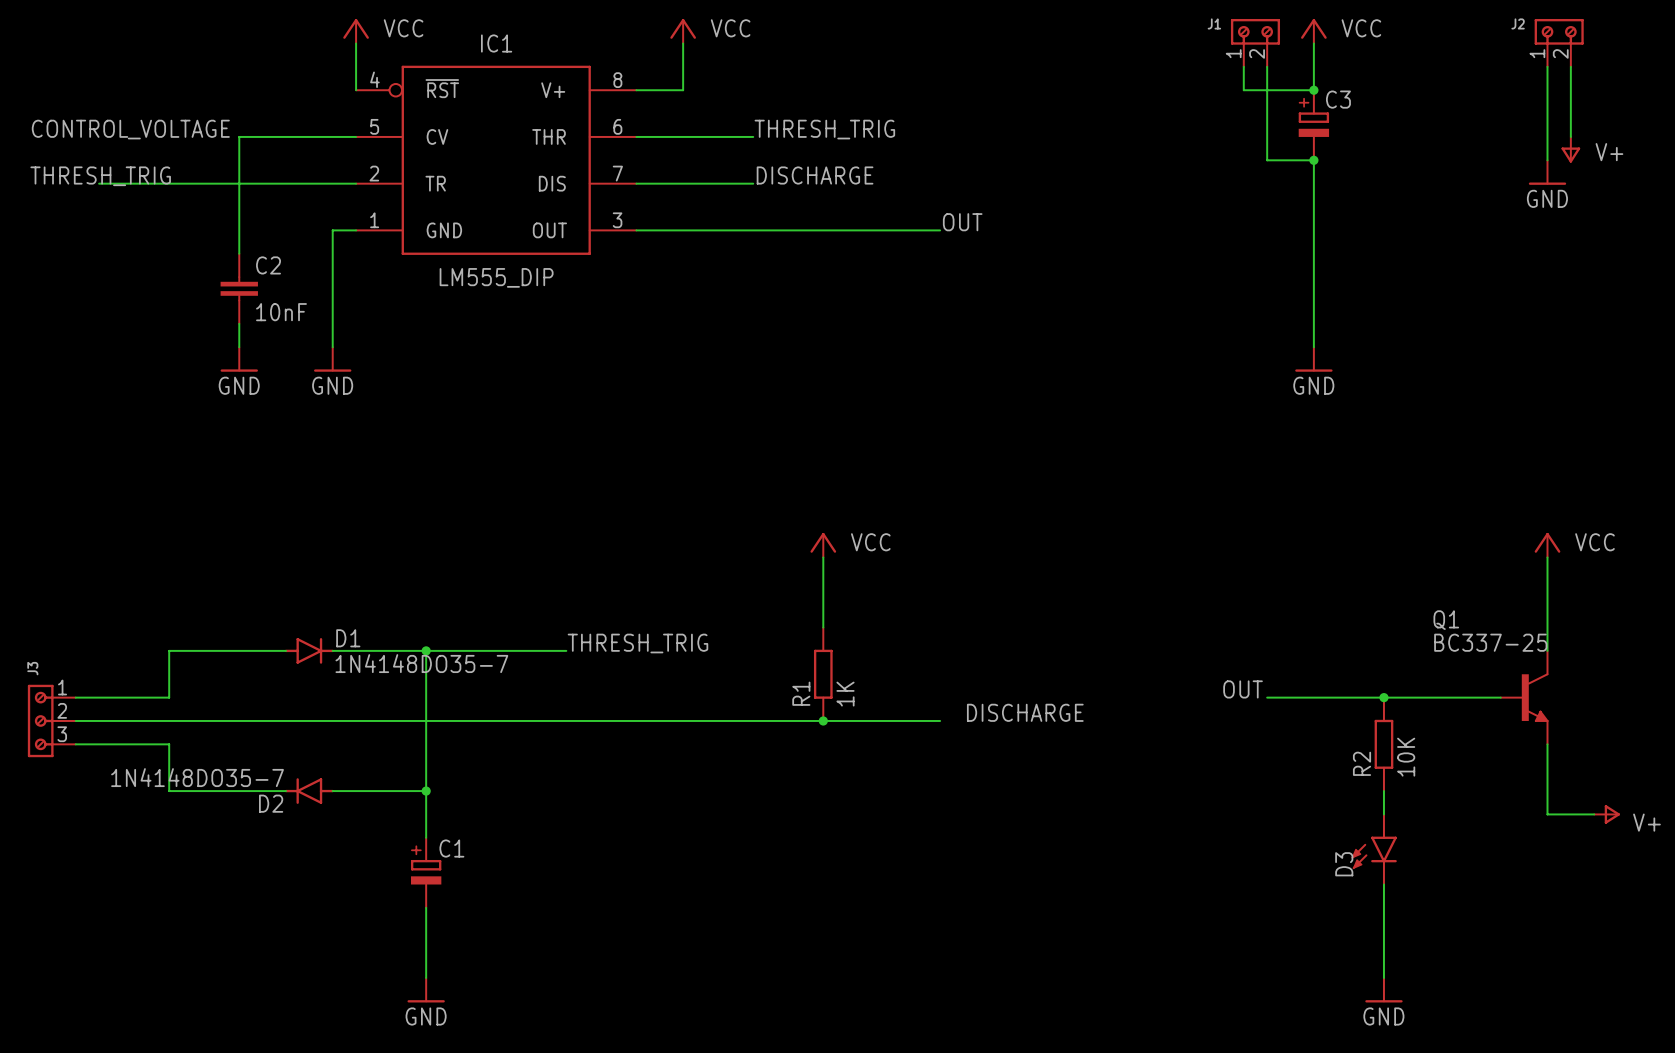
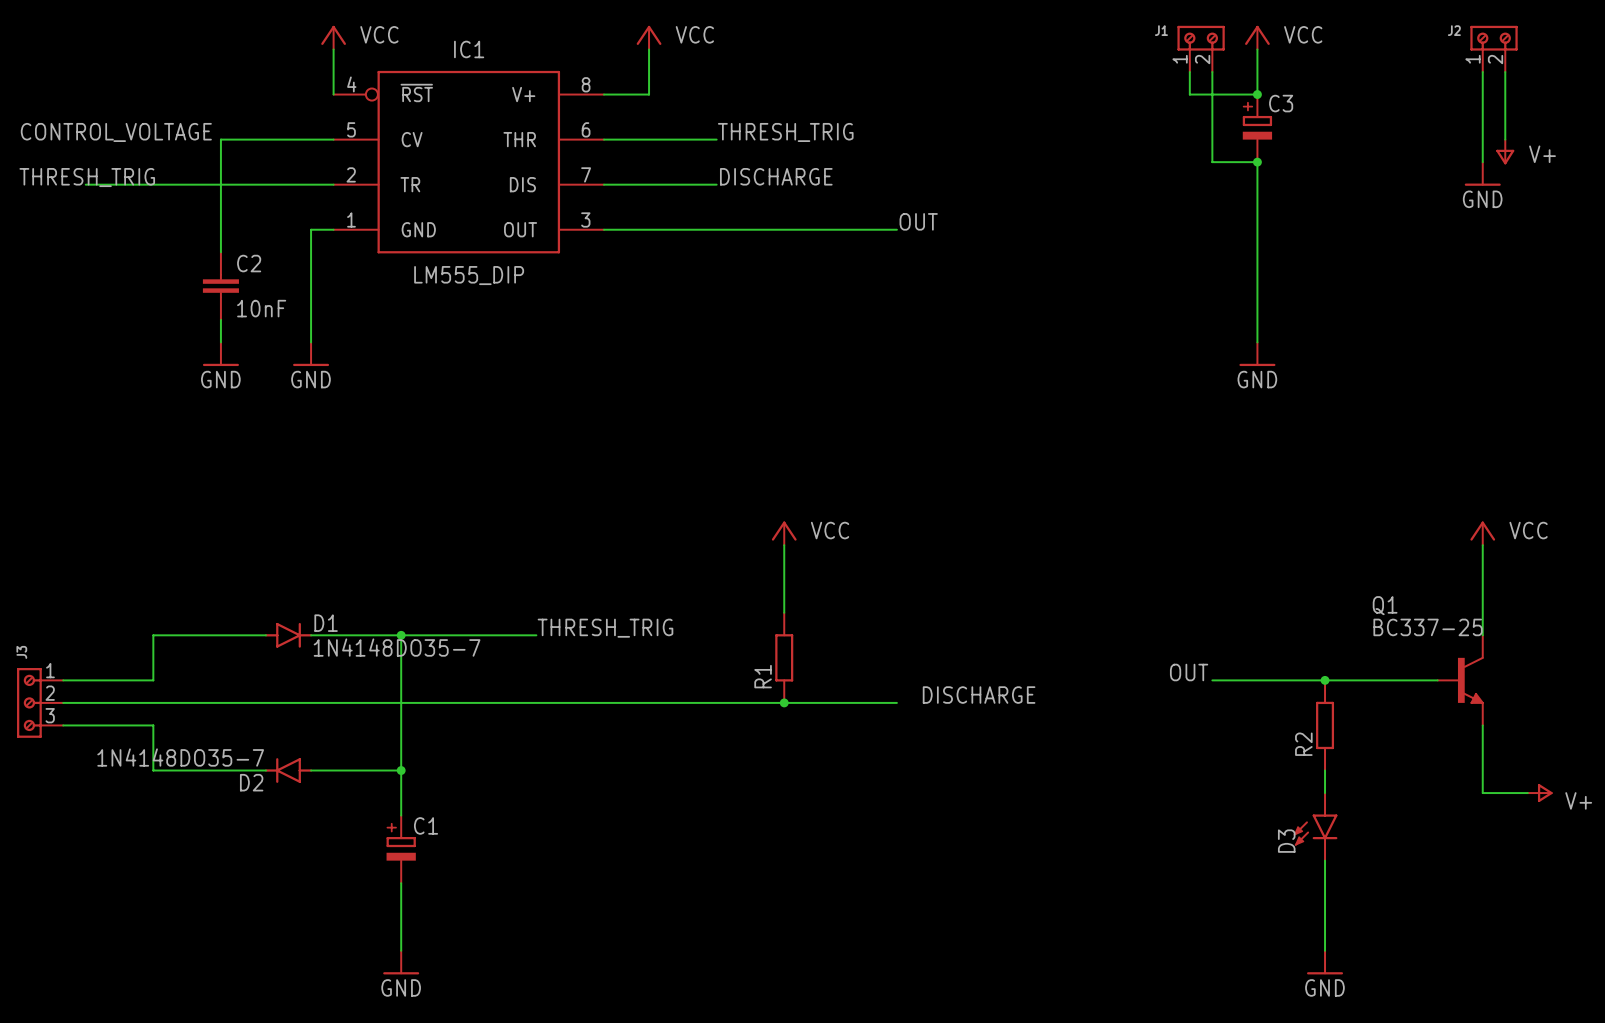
R1 value: 1K (845, 694) -> none
R2 value: 10K (1406, 757) -> none

